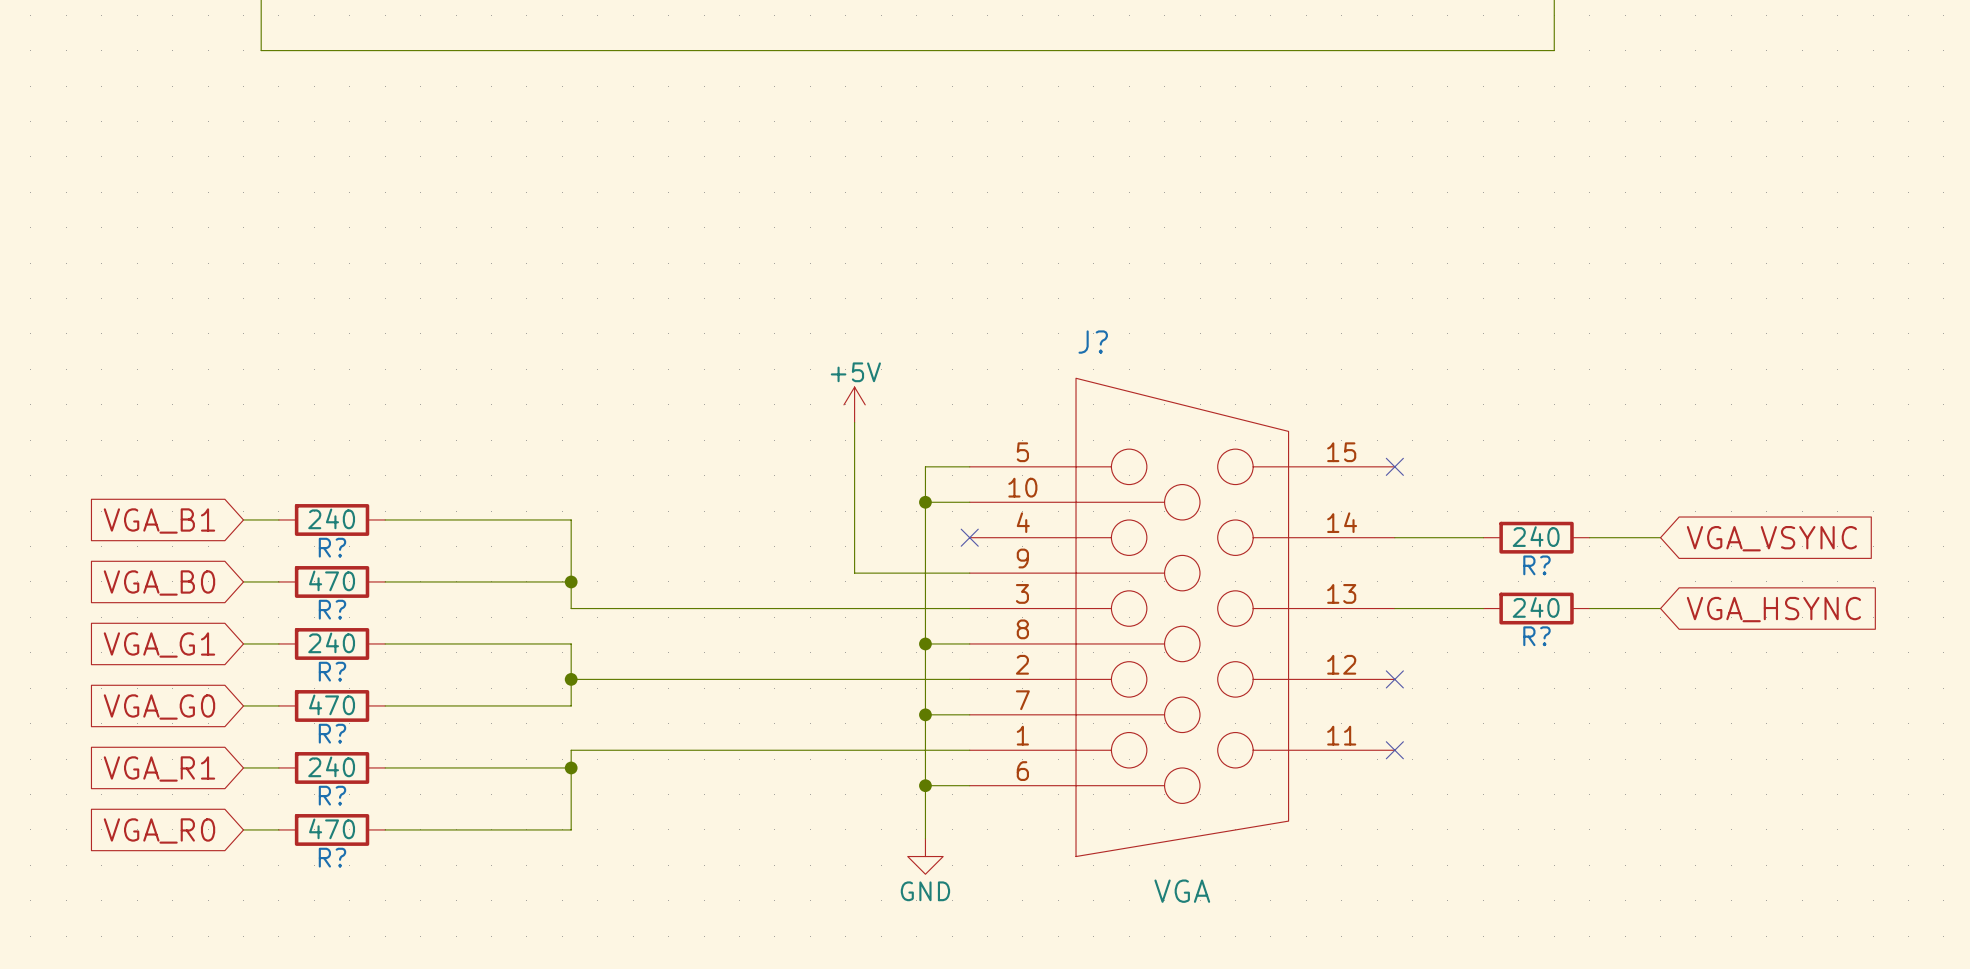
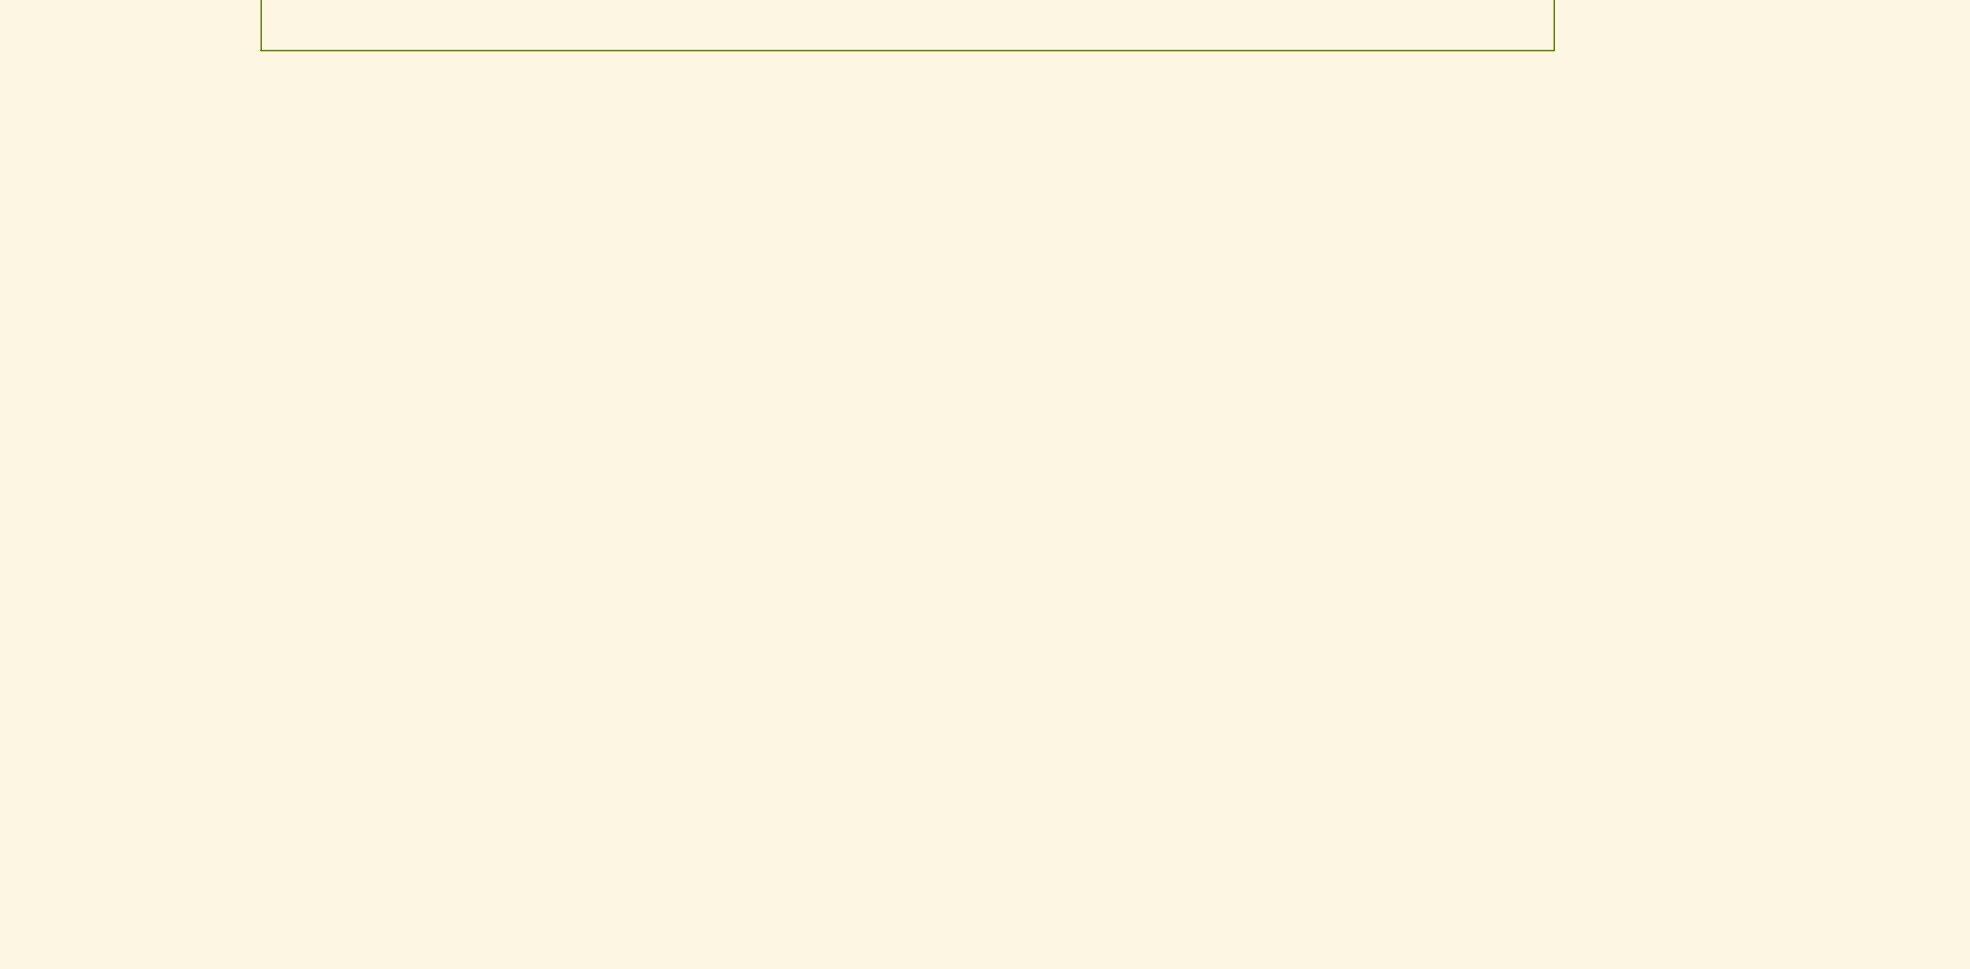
power symbol: +5V (854, 404) -> none
wire: (854, 422) (854, 573) (969, 573) -> none
wire: (969, 466) (925, 466) (925, 838) -> none
no-connect mark: (1394, 466) -> none
wire: (925, 502) (969, 502) -> none
junction: (925, 502) -> none
wire: (243, 519) (278, 519) -> none
R?: 240 (332, 519) -> none
wire: (385, 519) (571, 519) (571, 608) (969, 608) -> none
global label: VGA_B1 (159, 520) -> none
no-connect mark: (969, 537) -> none
wire: (1394, 537) (1483, 537) -> none
R?: 240 (1536, 537) -> none
wire: (1589, 537) (1660, 537) -> none
global label: VGA_VSYNC (1771, 538) -> none
wire: (243, 581) (278, 581) -> none
R?: 470 (332, 581) -> none
wire: (385, 581) (571, 581) -> none
junction: (571, 581) -> none
global label: VGA_B0 (159, 582) -> none
wire: (1394, 608) (1483, 608) -> none
R?: 240 (1536, 608) -> none
wire: (1589, 608) (1660, 608) -> none
global label: VGA_HSYNC (1773, 609) -> none
J?: VGA (1182, 617) -> none
wire: (243, 643) (278, 643) -> none
R?: 240 (332, 643) -> none
wire: (385, 643) (571, 643) (571, 705) (385, 705) -> none
wire: (925, 643) (969, 643) -> none
junction: (925, 643) -> none
global label: VGA_G1 (159, 644) -> none
wire: (571, 679) (969, 679) -> none
junction: (571, 679) -> none
no-connect mark: (1394, 679) -> none
wire: (243, 705) (278, 705) -> none
R?: 470 (332, 705) -> none
global label: VGA_G0 (159, 706) -> none
wire: (925, 714) (969, 714) -> none
junction: (925, 714) -> none
wire: (969, 750) (571, 750) (571, 829) (385, 829) -> none
no-connect mark: (1394, 750) -> none
wire: (243, 767) (278, 767) -> none
R?: 240 (332, 767) -> none
wire: (385, 767) (571, 767) -> none
junction: (571, 767) -> none
global label: VGA_R1 (159, 768) -> none
wire: (925, 785) (969, 785) -> none
junction: (925, 785) -> none
wire: (243, 829) (278, 829) -> none
R?: 470 (332, 829) -> none
global label: VGA_R0 (159, 830) -> none
power symbol: GND (925, 856) -> none

